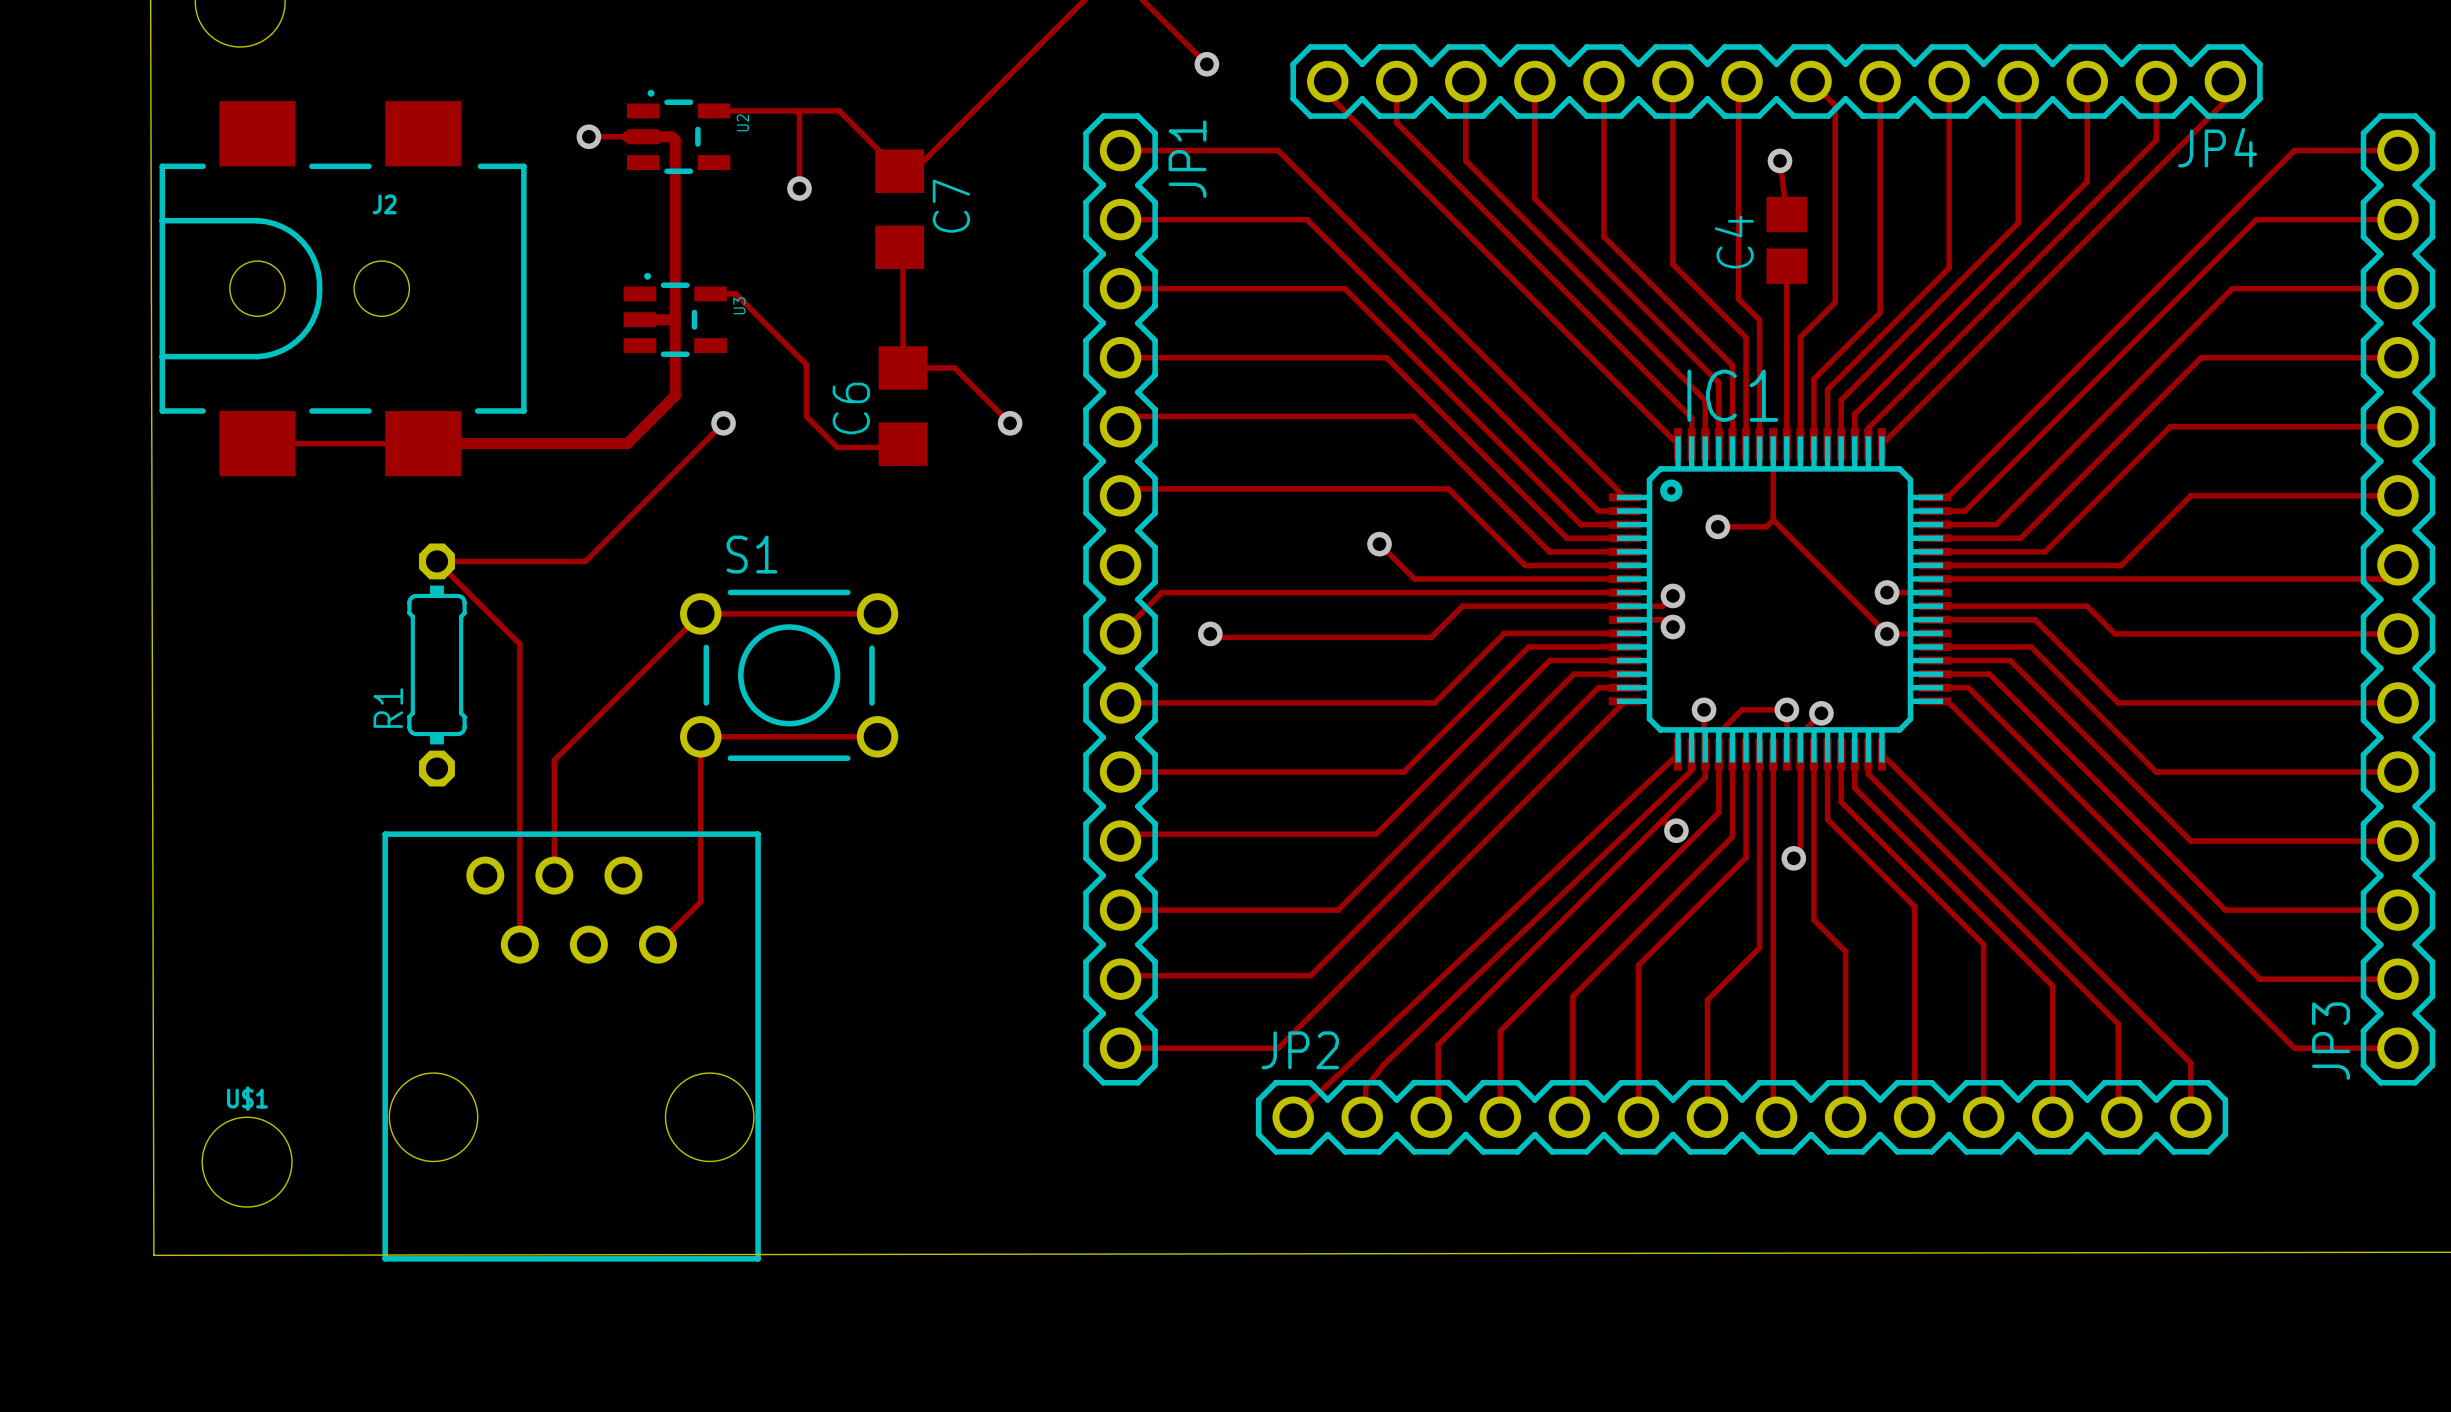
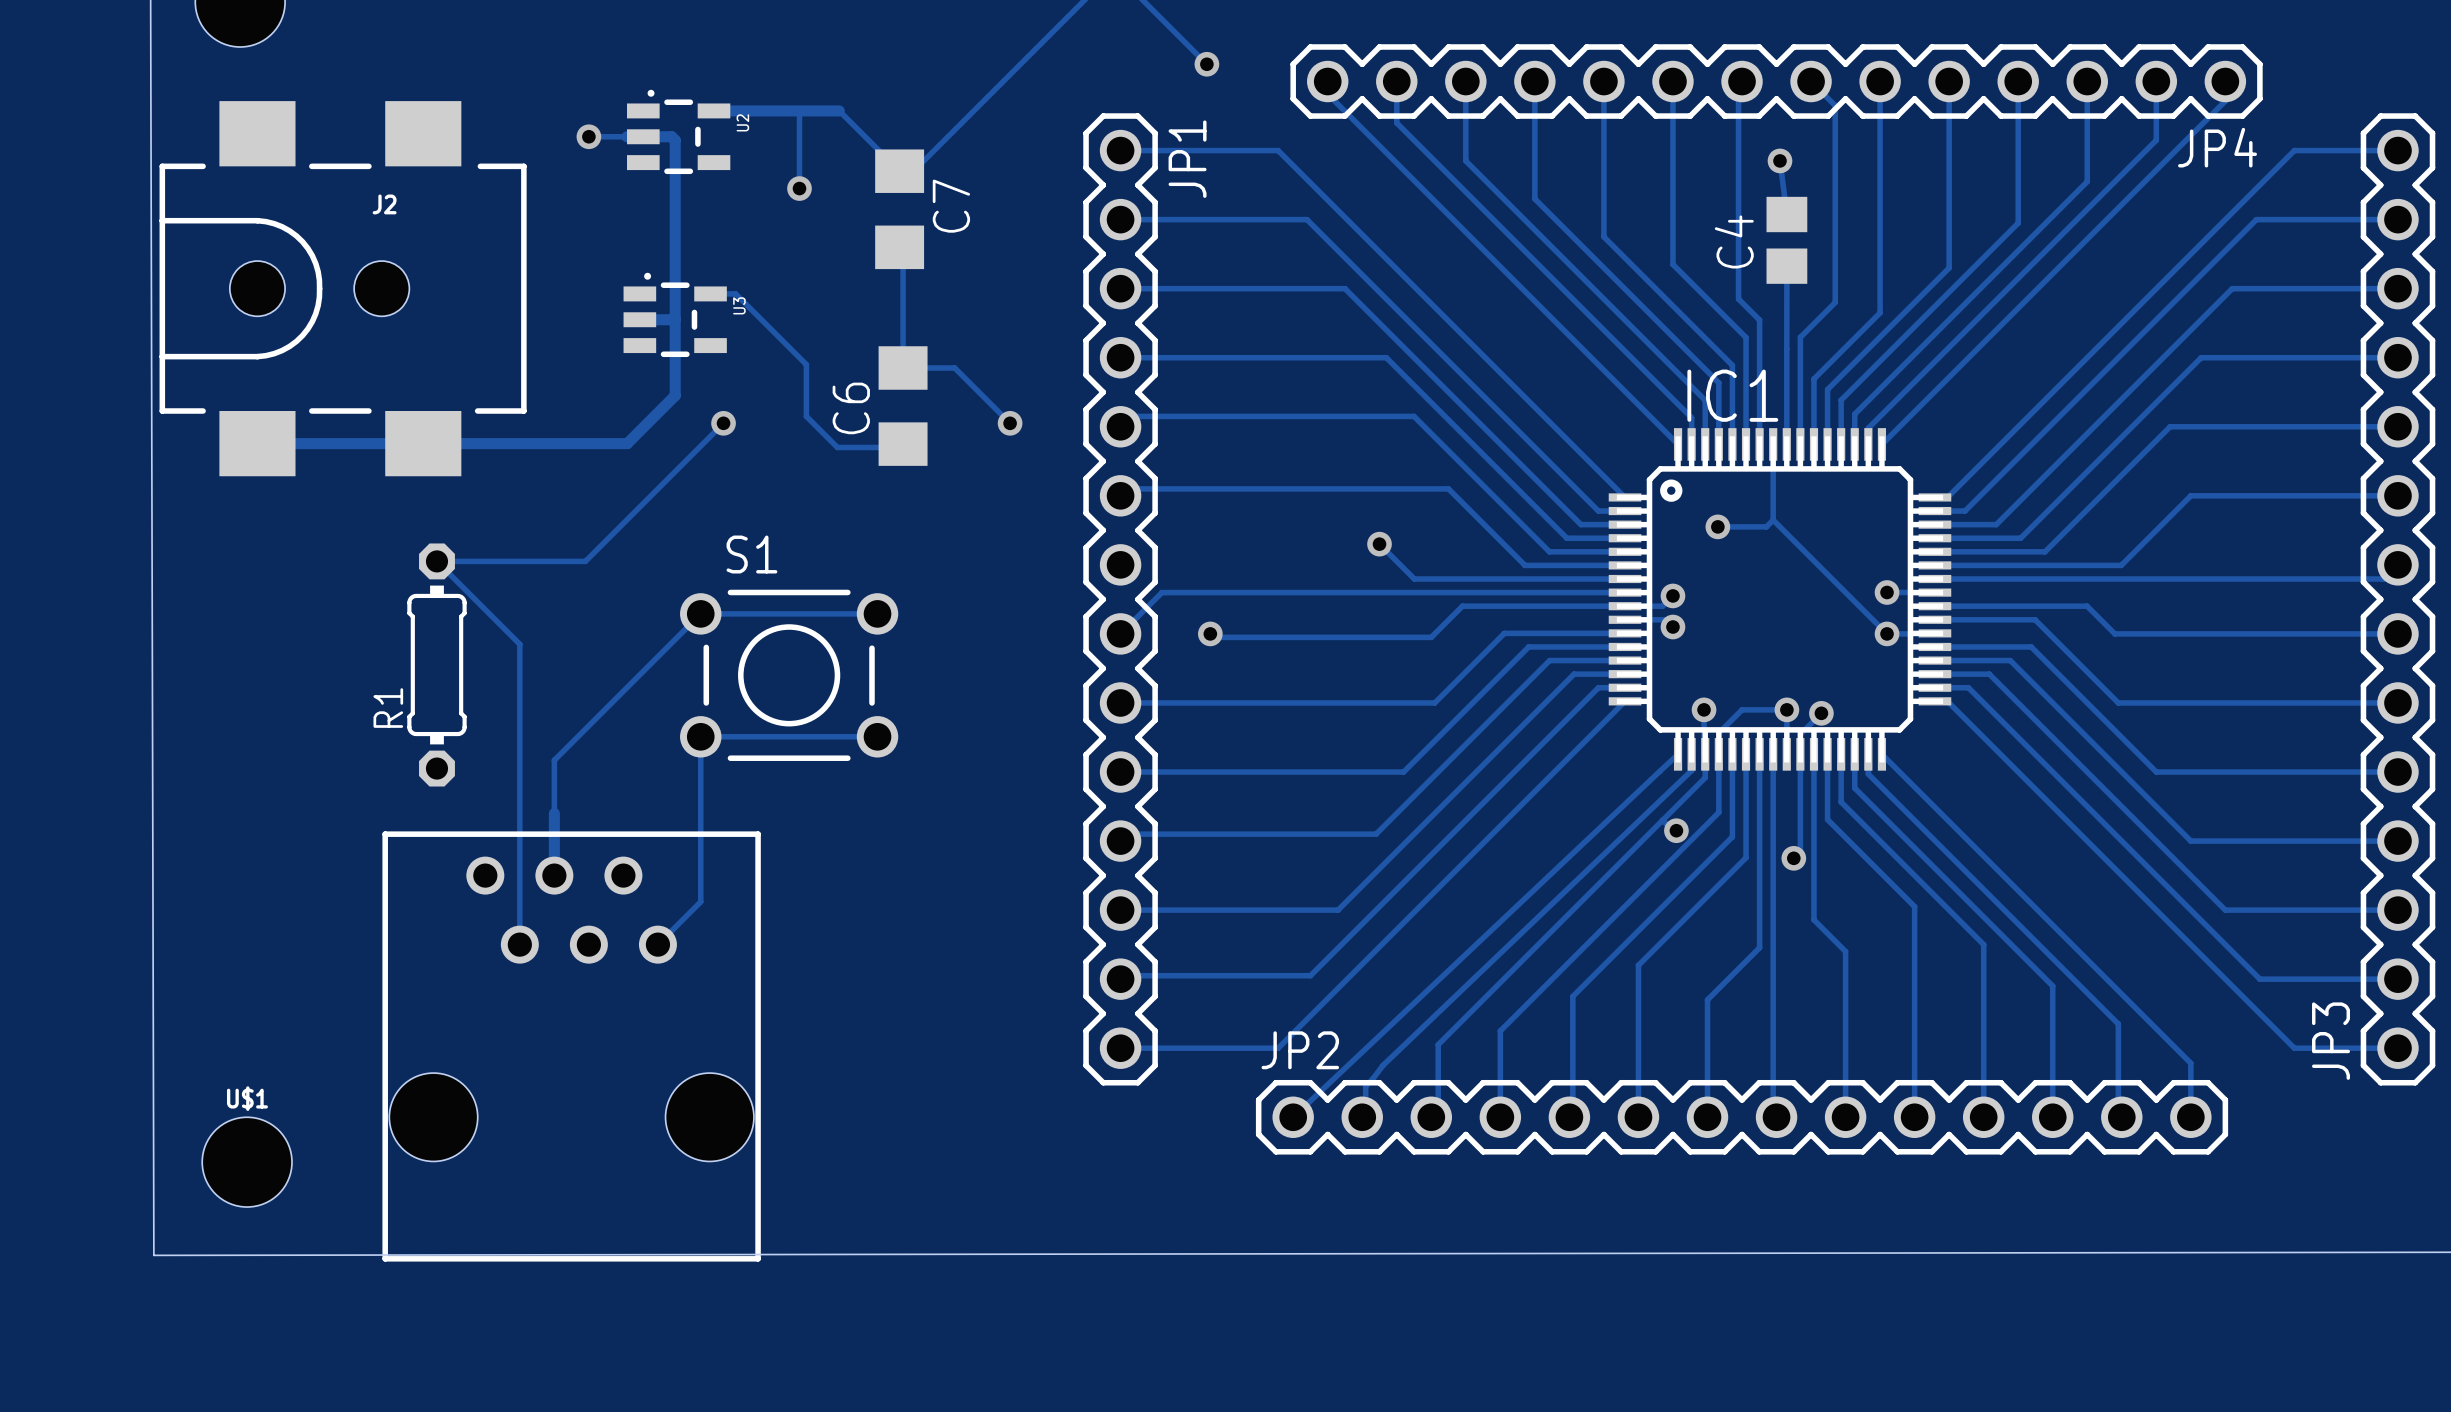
track width: thin (714, 110) (839, 110) -> thick (714, 110) (839, 110)
track width: thin (257, 443) (423, 443) -> thick (257, 443) (423, 443)
track width: thin (554, 813) (554, 875) -> thick (554, 813) (554, 875)

